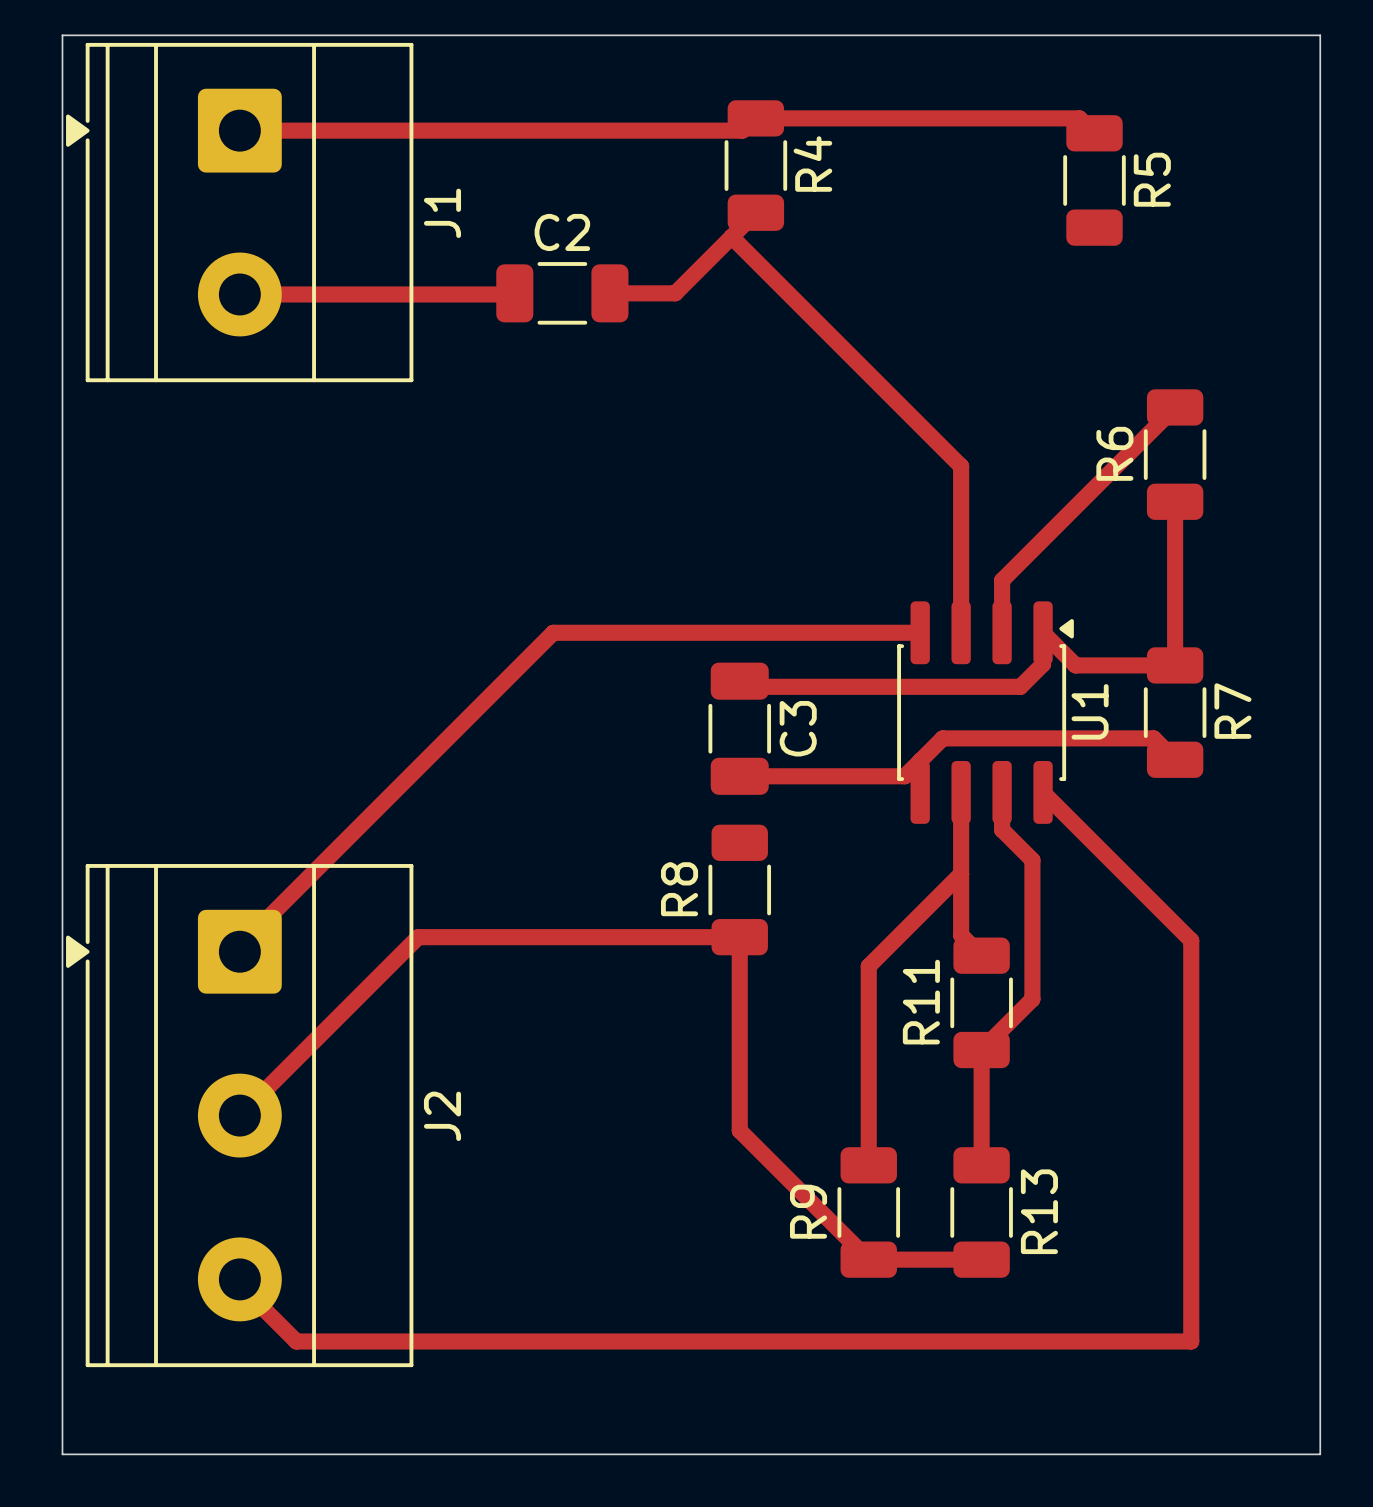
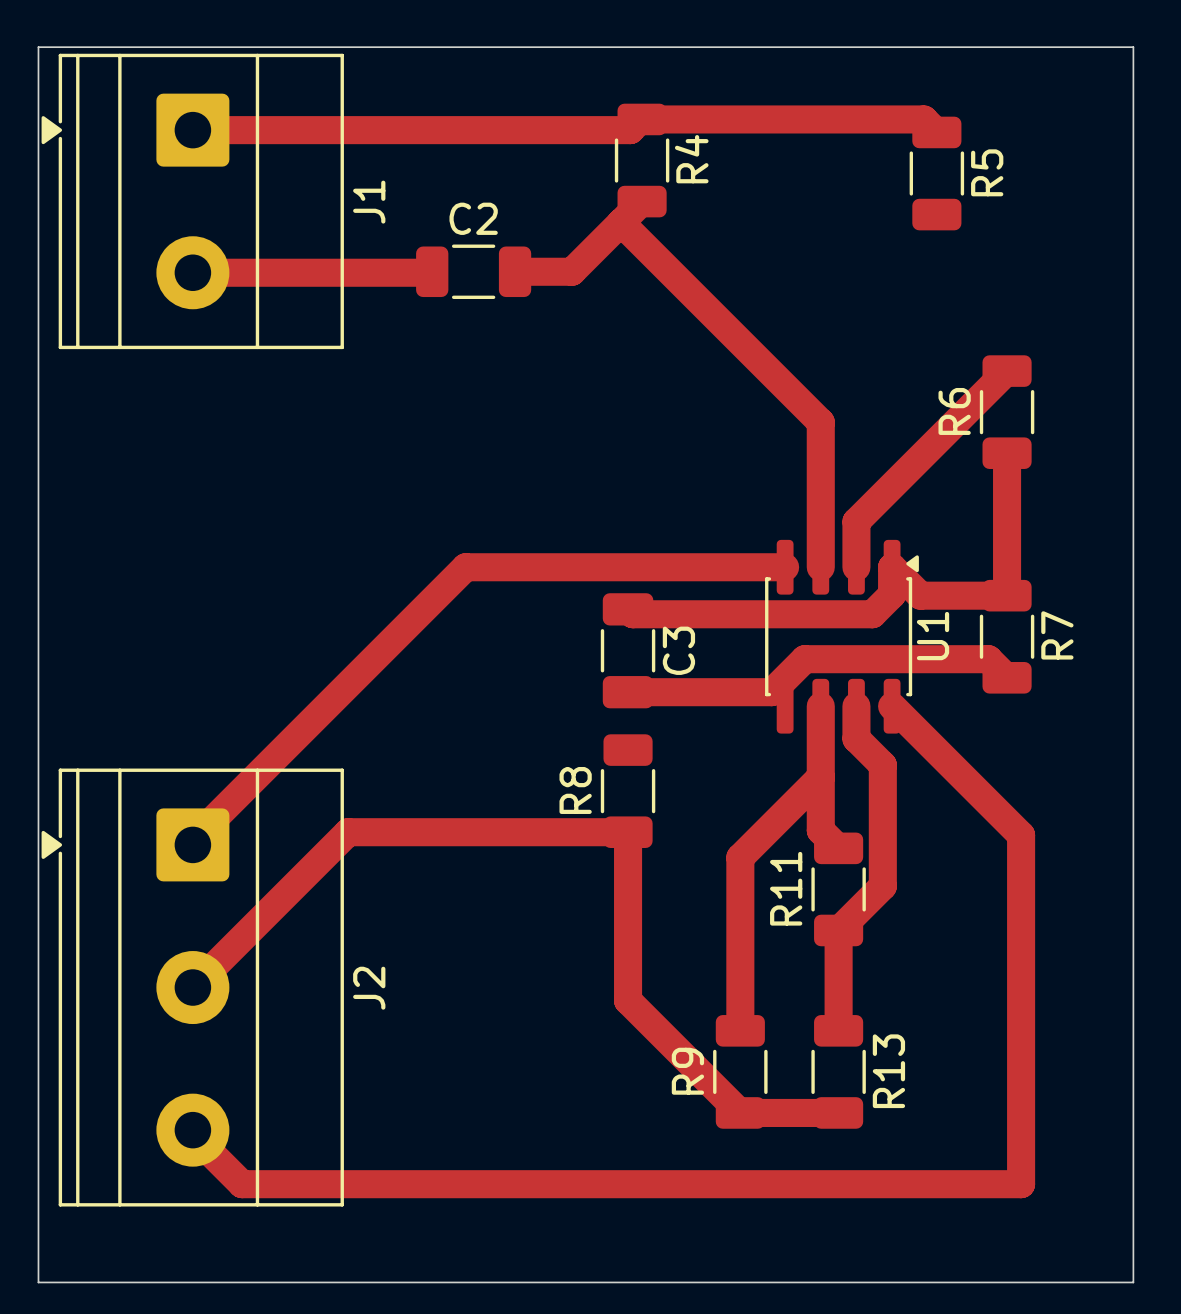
track width: thin (755, 117) (742, 130) (239, 130) -> thick (642, 118) (630, 130) (192, 130)
track width: thin (755, 118) (1079, 118) (1094, 133) -> thick (642, 119) (923, 119) (936, 132)
track width: thin (755, 212) (675, 293) (609, 293) -> thick (642, 201) (571, 271) (515, 271)
track width: thin (731, 236) (961, 466) (961, 632) -> thick (621, 222) (820, 422) (820, 567)
track width: thin (514, 293) (239, 294) -> thick (432, 271) (192, 272)
track width: thin (1175, 407) (1002, 580) (1002, 632) -> thick (1007, 371) (856, 521) (856, 567)
track width: thin (1175, 501) (1175, 665) (1075, 665) (1043, 632) (1043, 664) (1020, 686) (745, 686) (739, 681) -> thick (1007, 453) (1007, 595) (920, 595) (892, 567) (892, 594) (872, 614) (632, 614) (628, 609)
track width: thin (920, 632) (553, 632) (239, 946) (239, 951) -> thick (785, 567) (465, 567) (192, 840) (192, 844)
track width: thin (1175, 759) (1153, 738) (942, 738) (904, 776) (739, 776) -> thick (1007, 677) (988, 659) (804, 659) (771, 692) (628, 692)
track width: thin (961, 792) (961, 935) (981, 955) -> thick (820, 706) (820, 830) (838, 848)
track width: thin (1002, 792) (1002, 829) (1032, 860) (1032, 999) (981, 1050) (981, 1165) -> thick (856, 706) (856, 738) (882, 765) (882, 886) (838, 930) (838, 1030)
track width: thin (1043, 792) (1191, 940) (1191, 1341) (296, 1341) (239, 1284) (239, 1279) -> thick (892, 706) (1021, 835) (1021, 1184) (242, 1184) (192, 1134) (192, 1130)
track width: thin (961, 873) (868, 966) (868, 1165) -> thick (820, 777) (740, 857) (740, 1030)
track width: thin (739, 937) (418, 937) (239, 1115) -> thick (628, 832) (348, 832) (192, 987)
track width: thin (739, 938) (739, 1130) (868, 1259) (981, 1259) -> thick (628, 833) (628, 1000) (740, 1112) (838, 1112)

